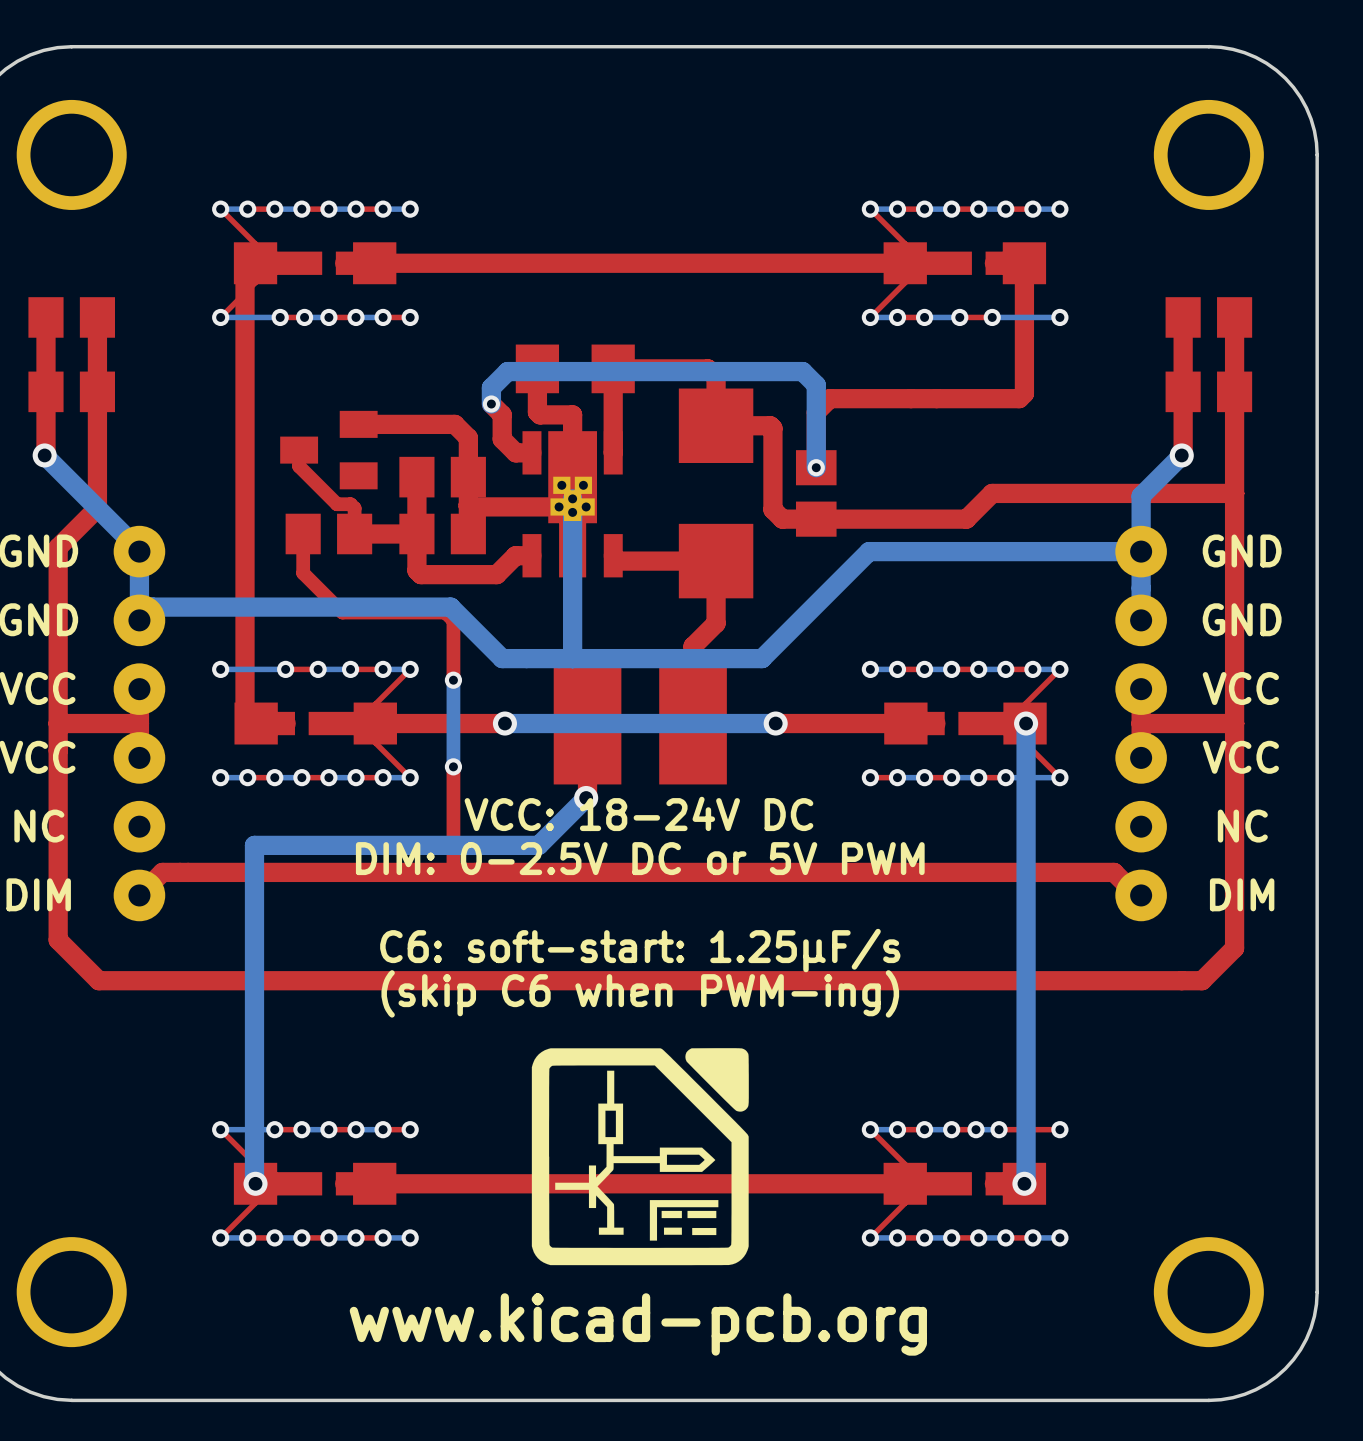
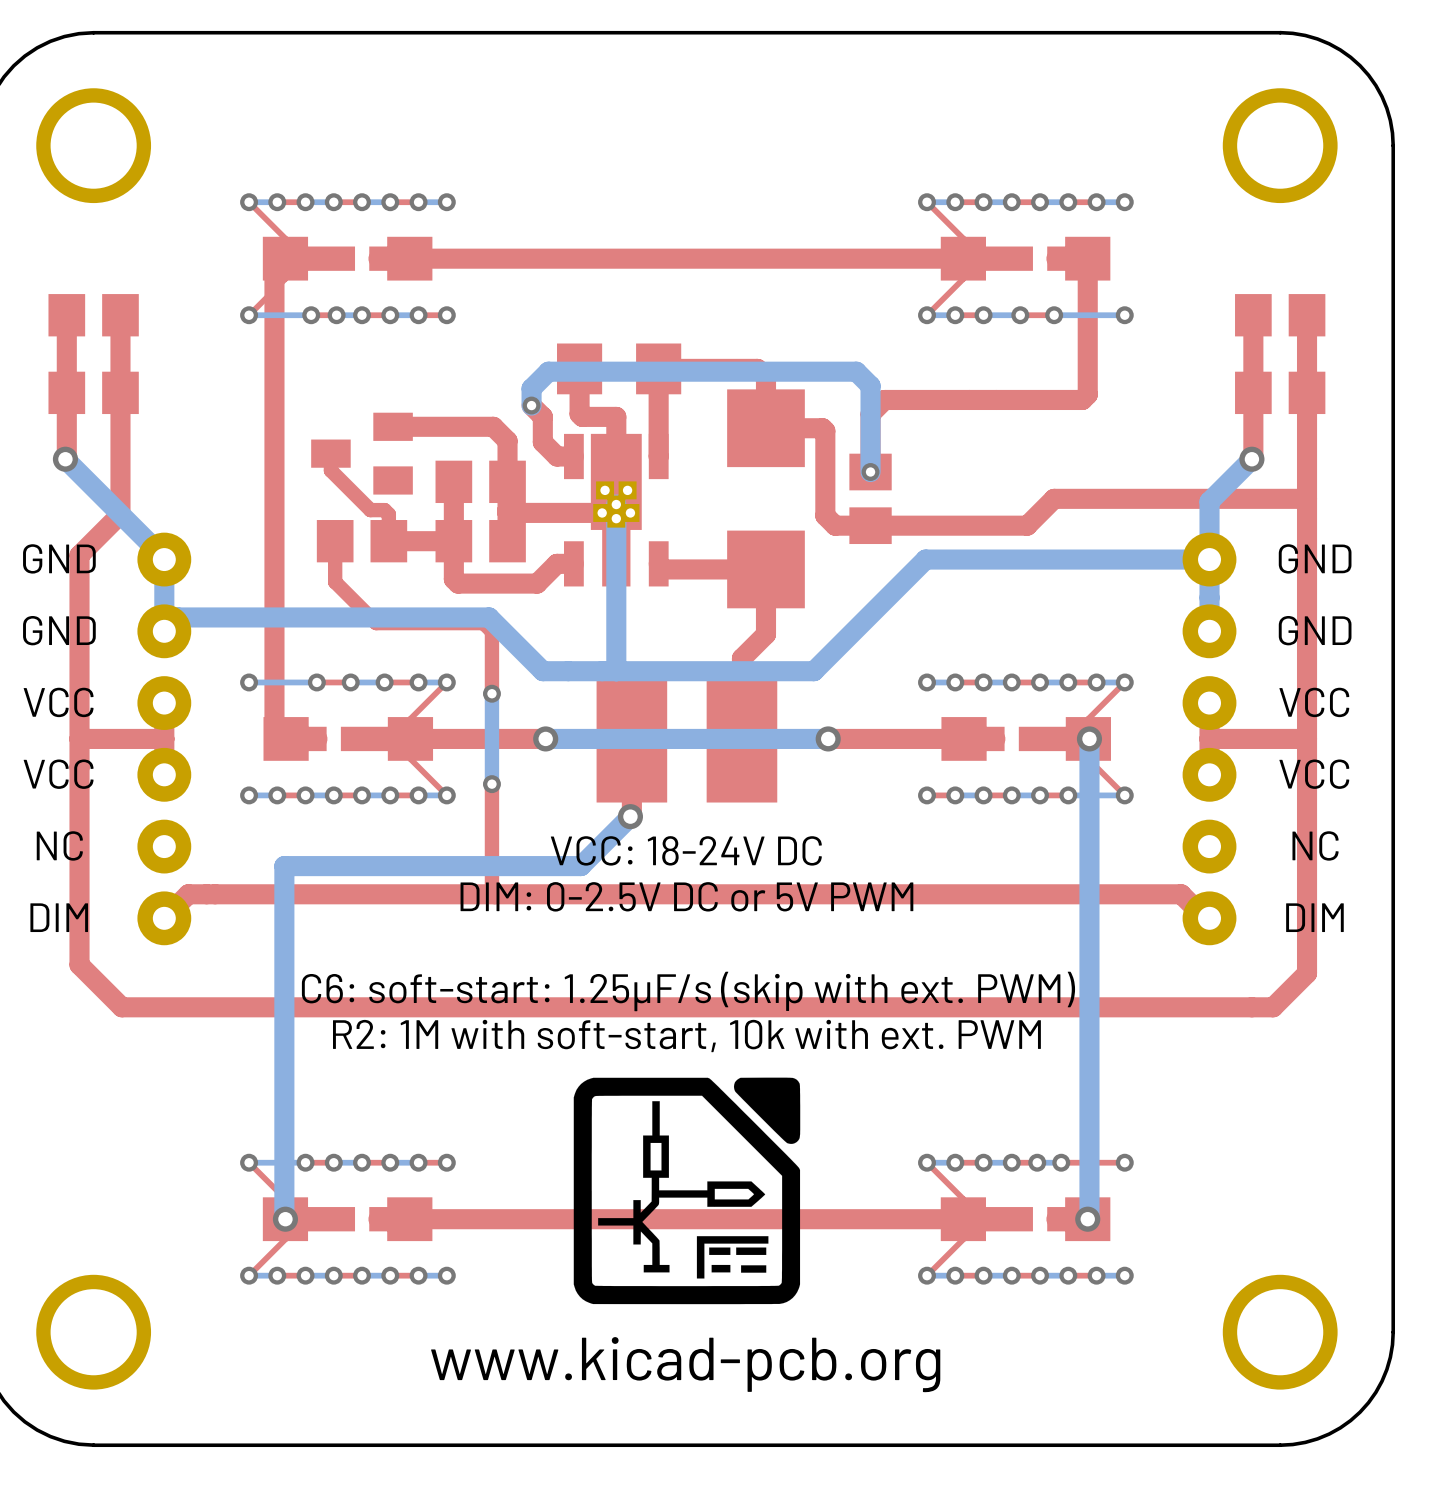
text position: VCC: 18-24V DC (638, 813) -> VCC: 18-24V DC (686, 850)
text position: DIM: 0-2.5V DC or 5V PWM (640, 858) -> DIM: 0-2.5V DC or 5V PWM (686, 896)
text: C6: soft-start: 1.25µF/s (640, 950) -> C6: soft-start: 1.25µF/s (skip with ext. PWM) (688, 991)
text: (skip C6 when PWM-ing) (640, 993) -> none
text: none -> R2: 1M with soft-start, 10k with ext. PWM (686, 1035)

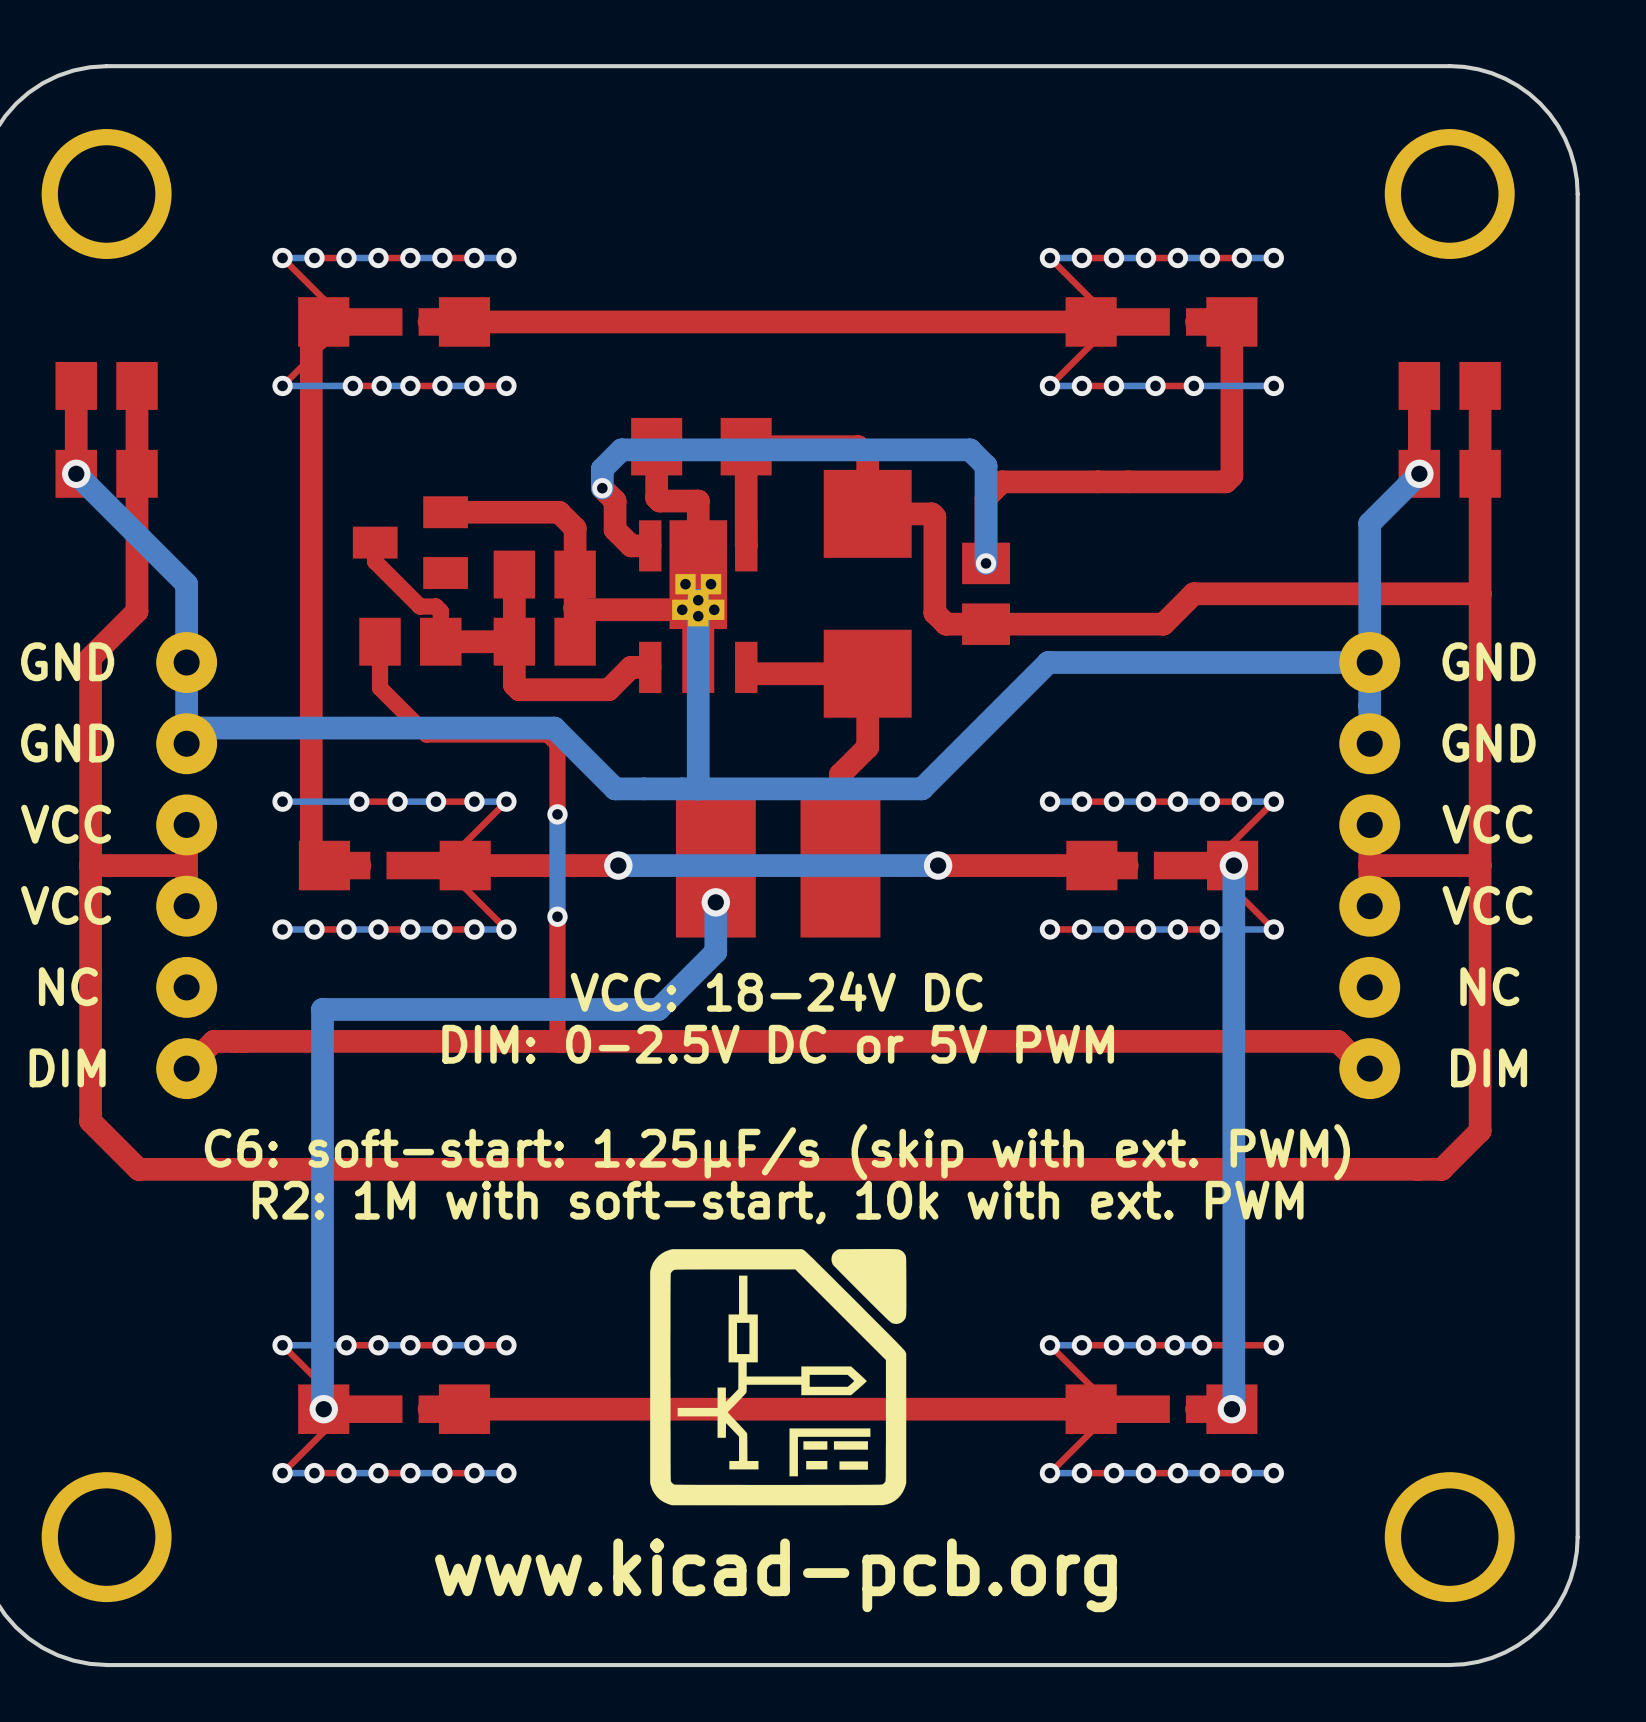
top track: (66, 392) (65, 459) -> none
top track: (1253, 392) (1251, 459) -> none
bottom track: (65, 459) (164, 558) -> (76, 473) (186, 584) (186, 660)
via position: (65, 459) -> (76, 473)
bottom track: (1251, 459) (1209, 501) -> (1419, 473) (1369, 523) (1369, 596)
via position: (1251, 459) -> (1419, 473)
bottom track: none -> (715, 902) (714, 953)
via position: (630, 816) -> (715, 902)

